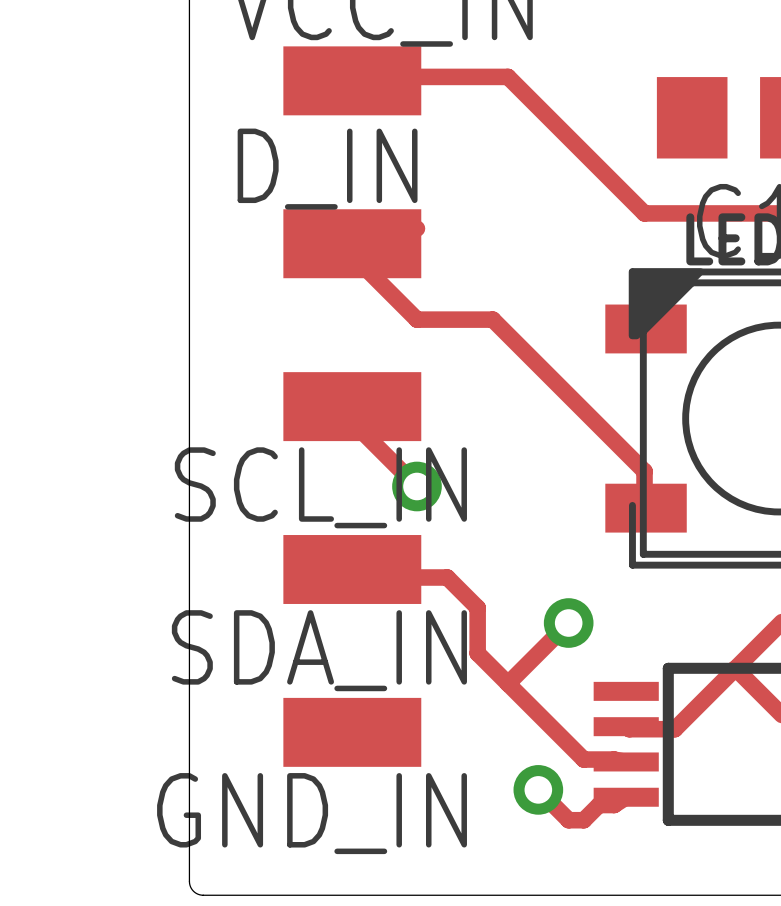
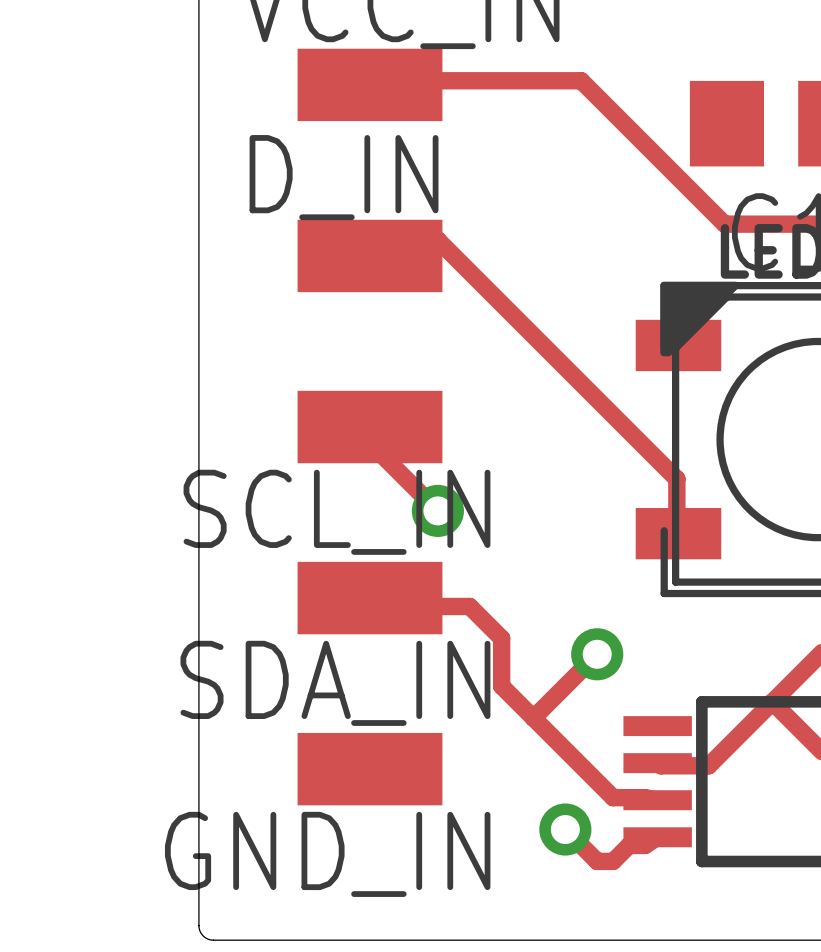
track: (507, 76) (644, 213) (690, 213) -> (533, 80) (581, 80) (724, 224)
track: (352, 243) (341, 243) (416, 319) (492, 319) (644, 471) -> (437, 240) (676, 479) (676, 494)

